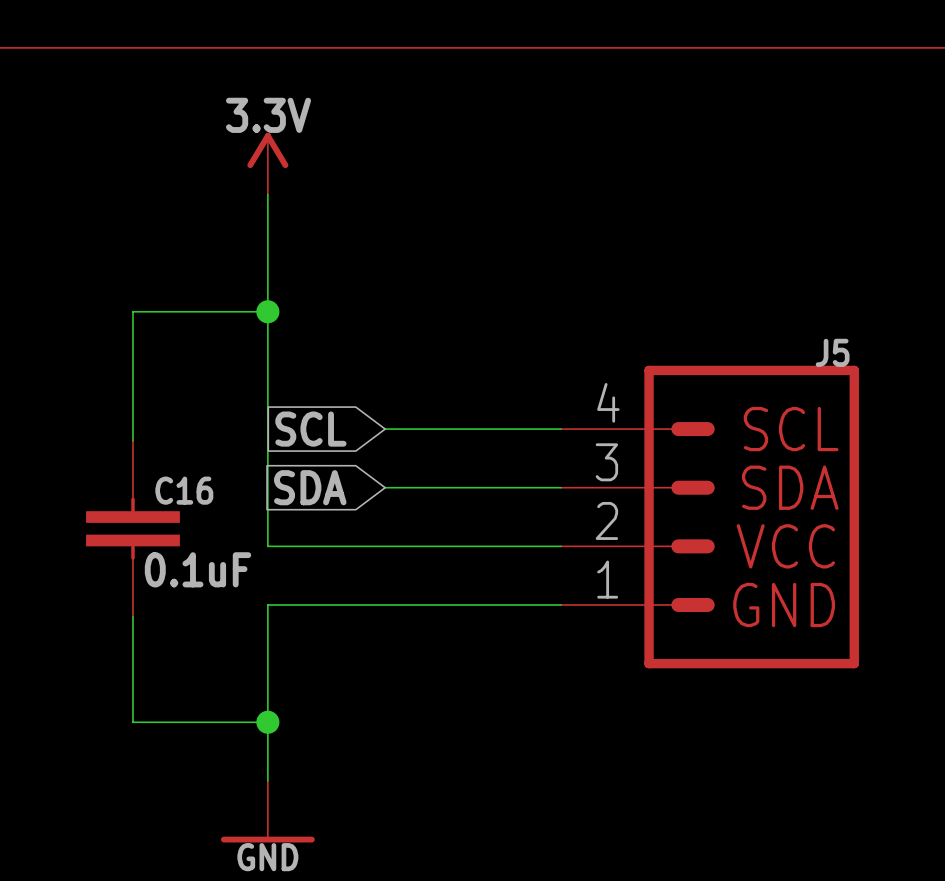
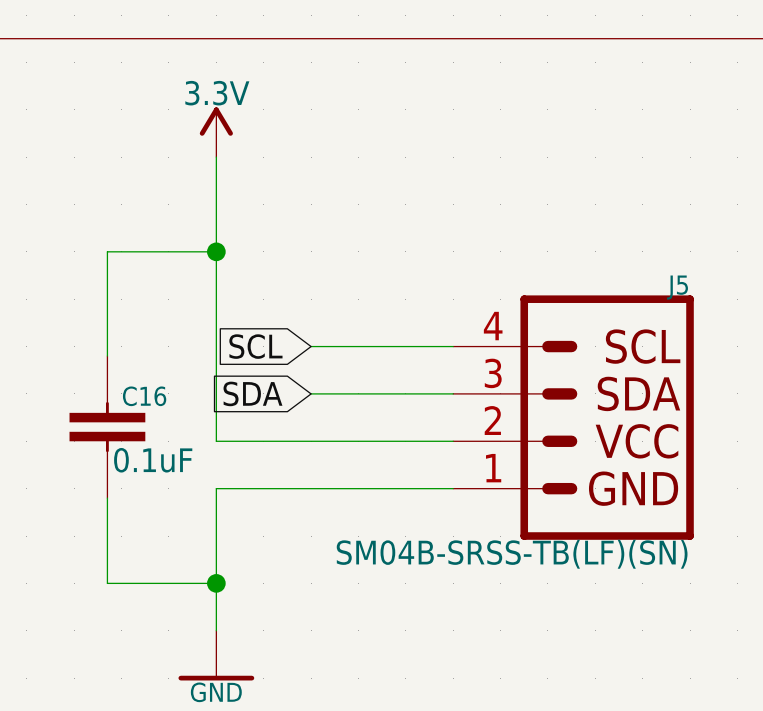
J5 value: none -> SM04B-SRSS-TB(LF)(SN) (512, 554)

